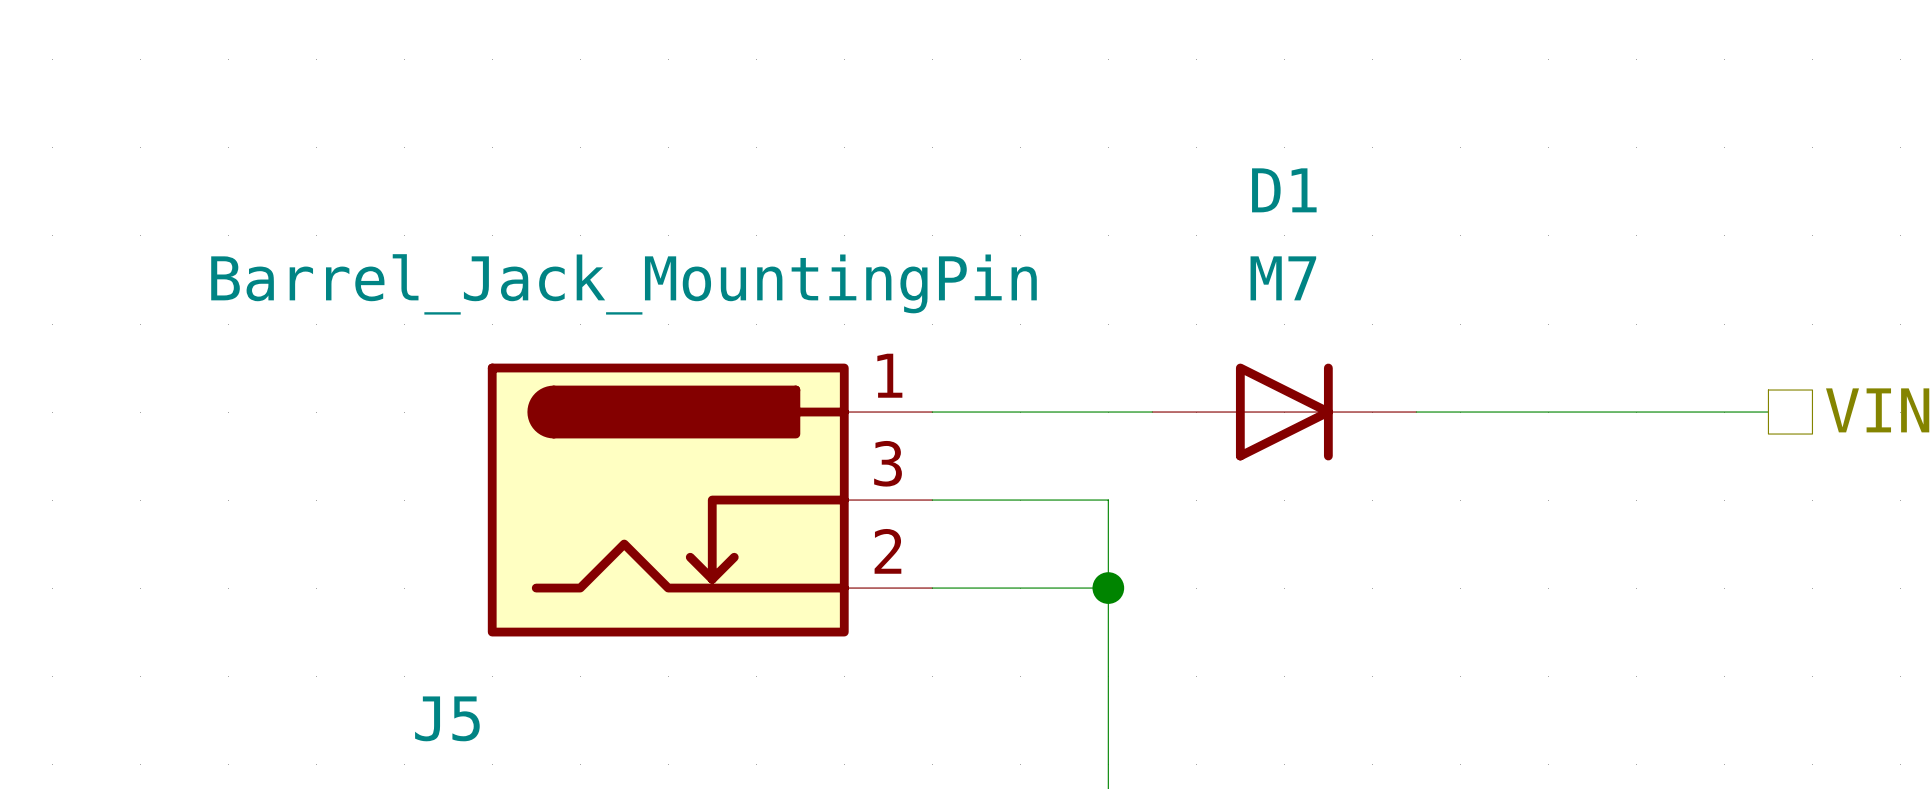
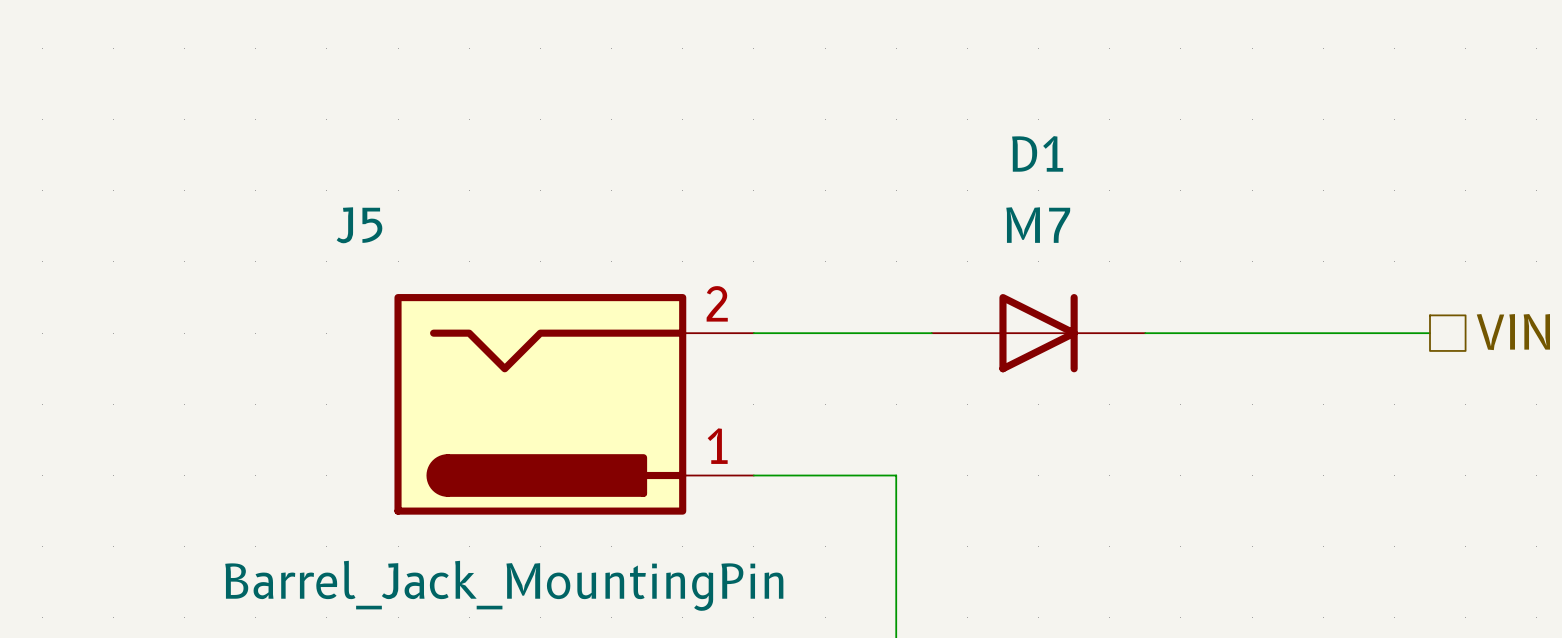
J5 value position: Barrel_Jack_MountingPin (624, 284) -> Barrel_Jack_MountingPin (504, 585)
J5 symbol: [487, 363, 933, 637] -> [394, 294, 754, 515]
wire: (932, 500) (1108, 500) (1108, 588) -> none
junction: (1108, 588) -> none
J5 name position: J5 (447, 718) -> J5 (359, 225)

